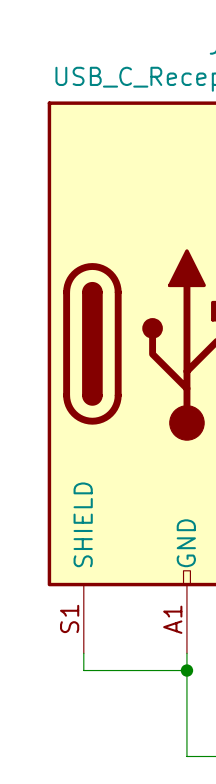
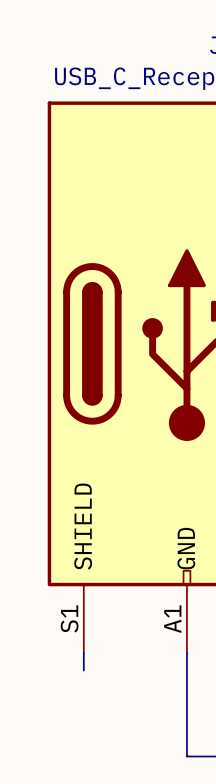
wire: (83, 670) (186, 670) -> none
junction: (186, 670) -> none

